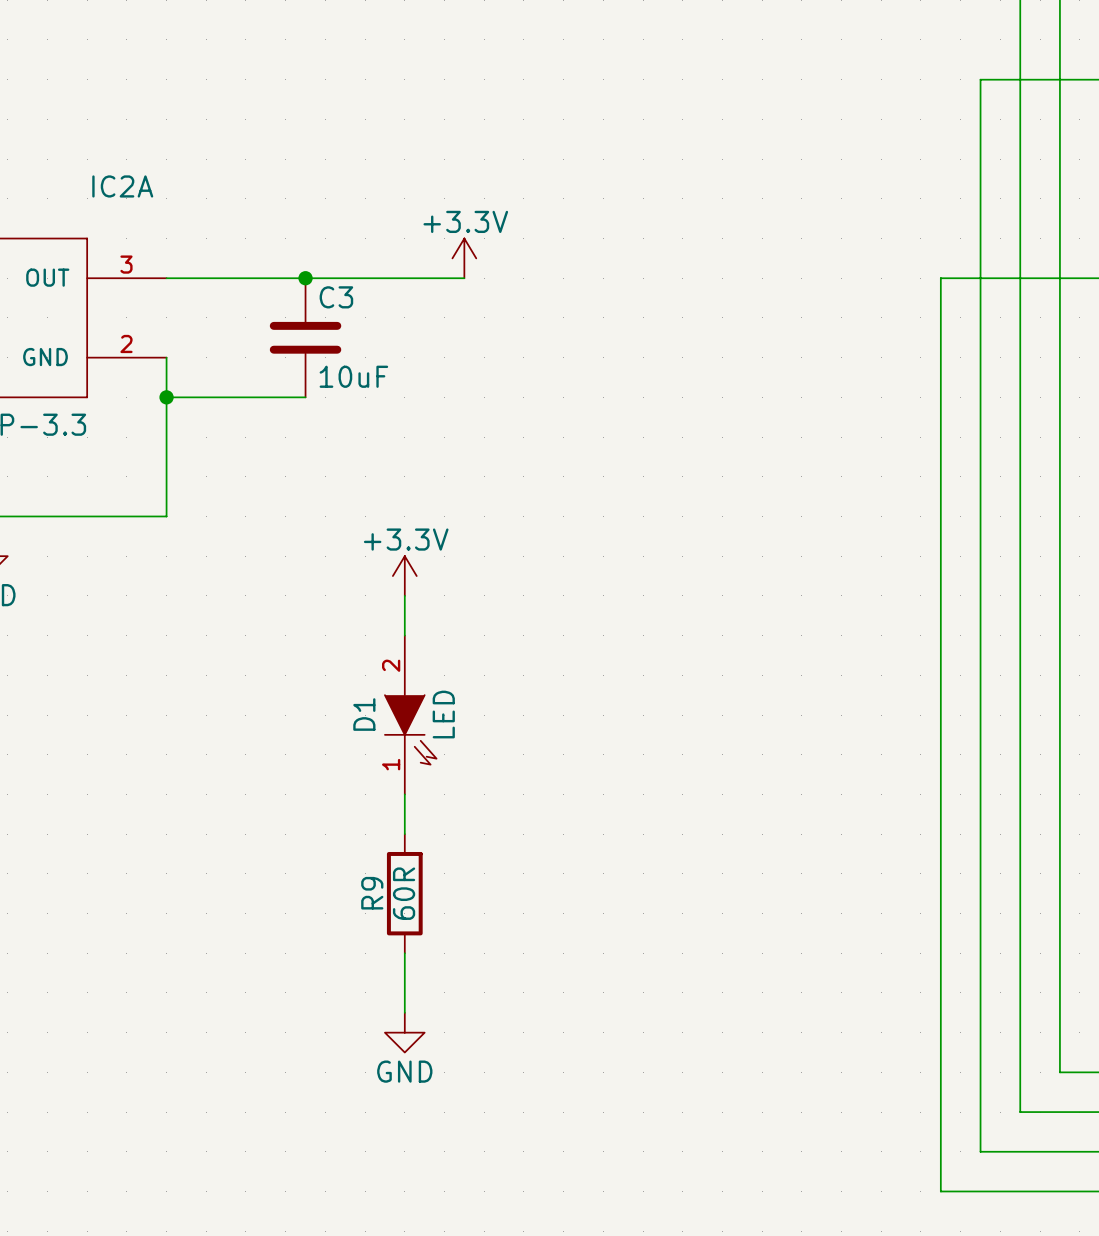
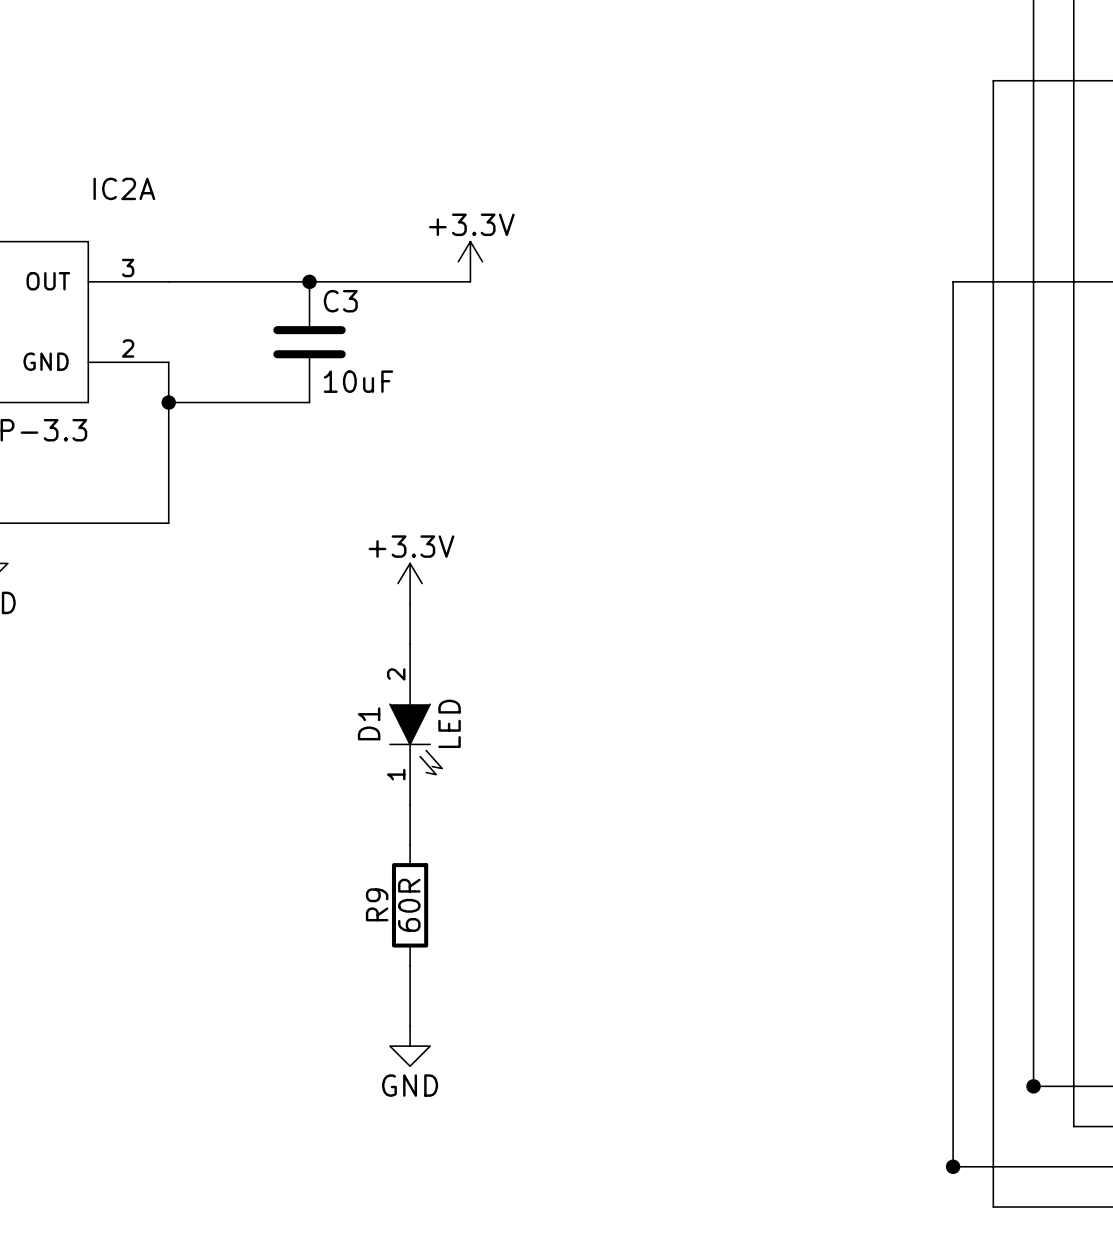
wire: (1020, 1072) (1020, 1112) (1059, 1112) -> (1033, 1086) (1073, 1086) (1073, 1126)
junction: none -> (1033, 1086)
wire: (940, 1151) (940, 1191) (980, 1191) -> (953, 1166) (993, 1166) (993, 1207)
junction: none -> (953, 1166)

